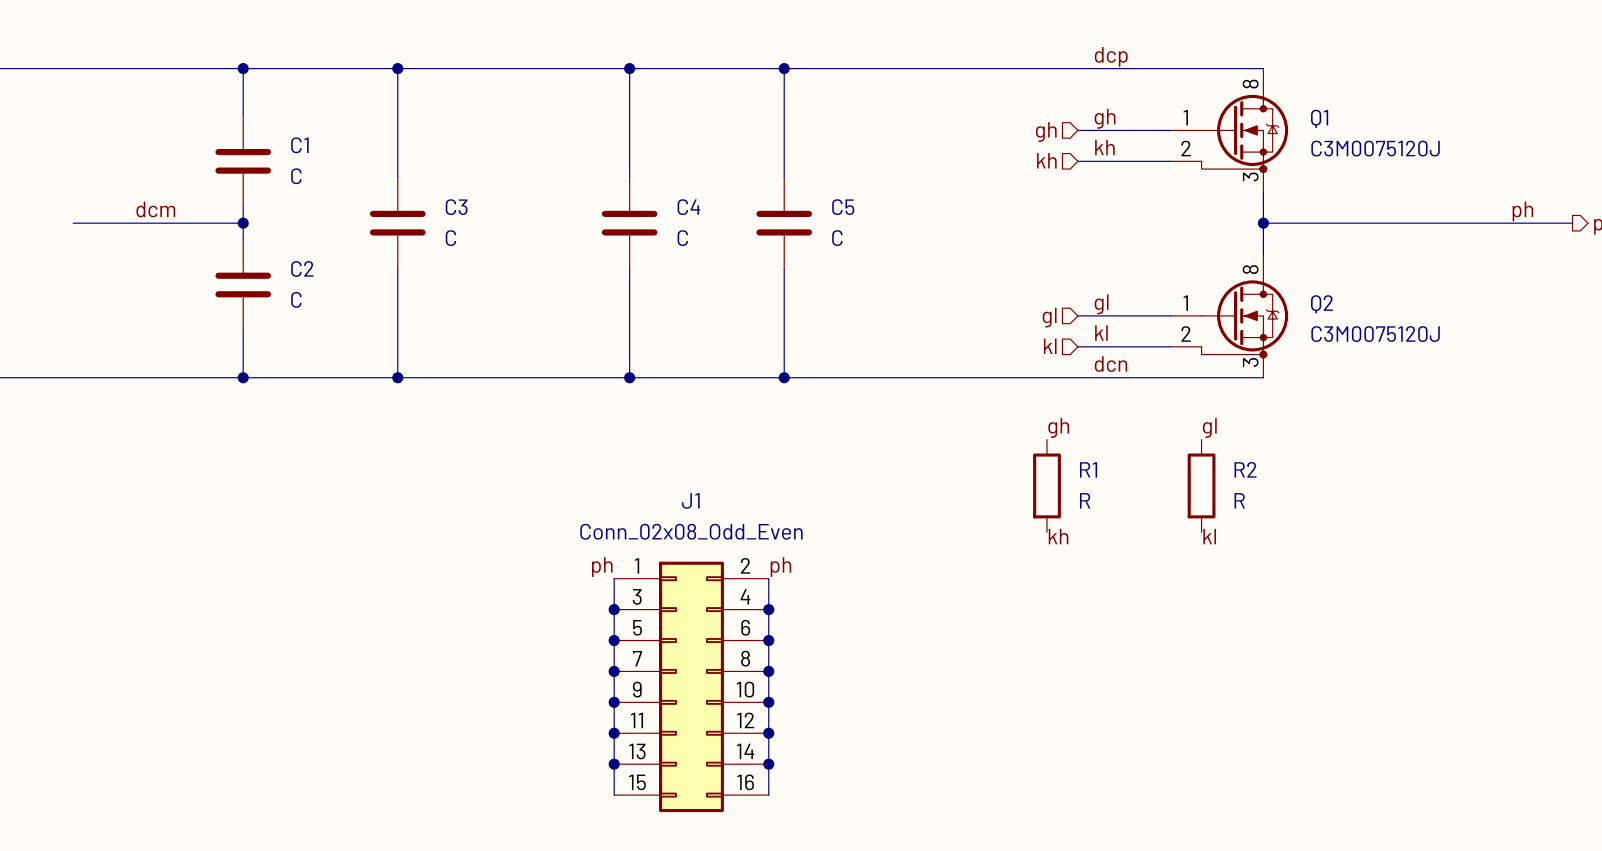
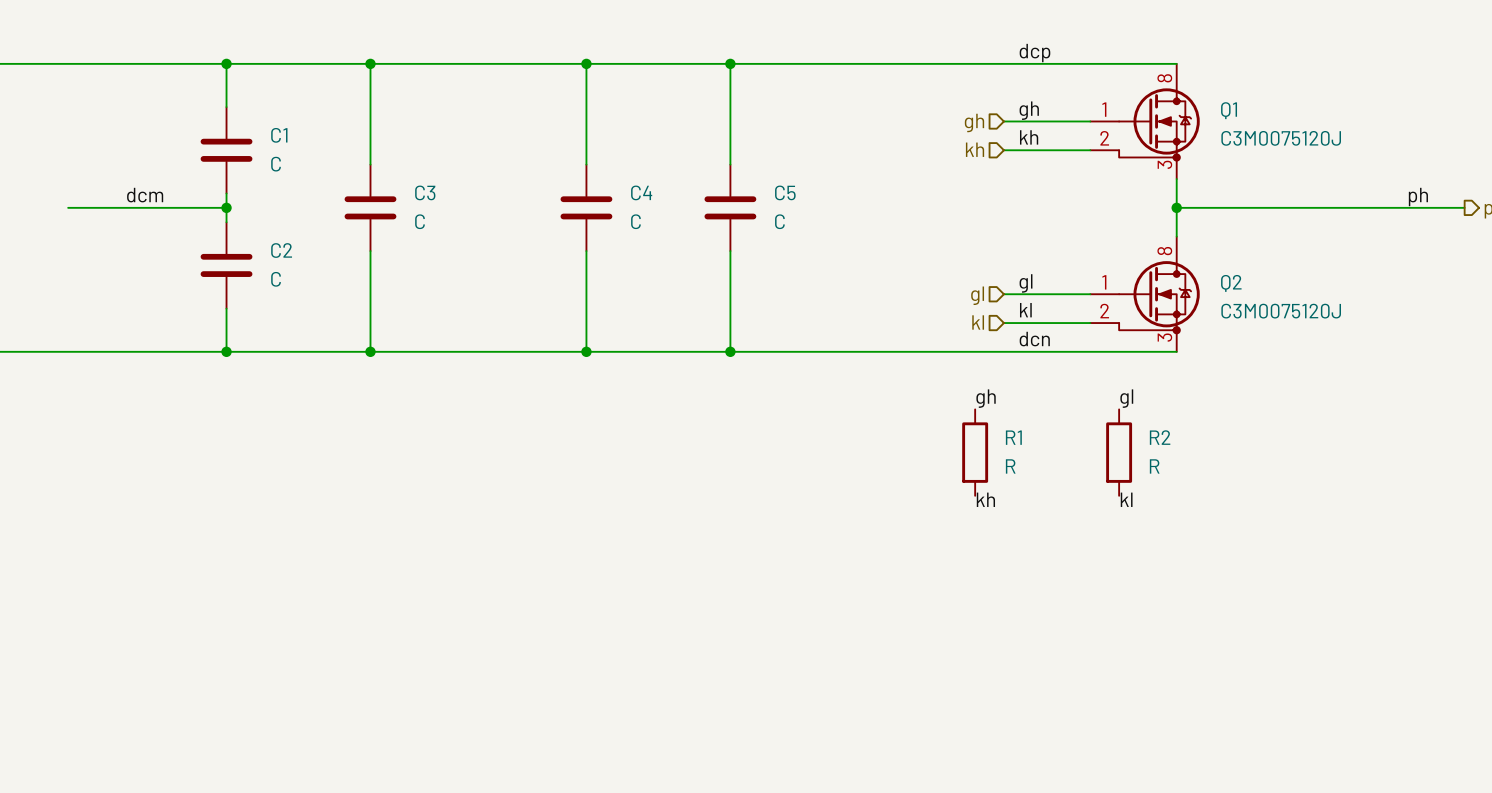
label: ph (602, 567) -> none
label: ph (780, 567) -> none
wire: (614, 578) (614, 795) -> none
wire: (768, 578) (768, 795) -> none
junction: (614, 609) -> none
junction: (768, 609) -> none
junction: (614, 640) -> none
junction: (768, 640) -> none
junction: (614, 671) -> none
junction: (768, 671) -> none
J1: Conn_02x08_Odd_Even (691, 686) -> none
junction: (614, 702) -> none
junction: (768, 702) -> none
junction: (614, 733) -> none
junction: (768, 733) -> none
junction: (614, 764) -> none
junction: (768, 764) -> none

